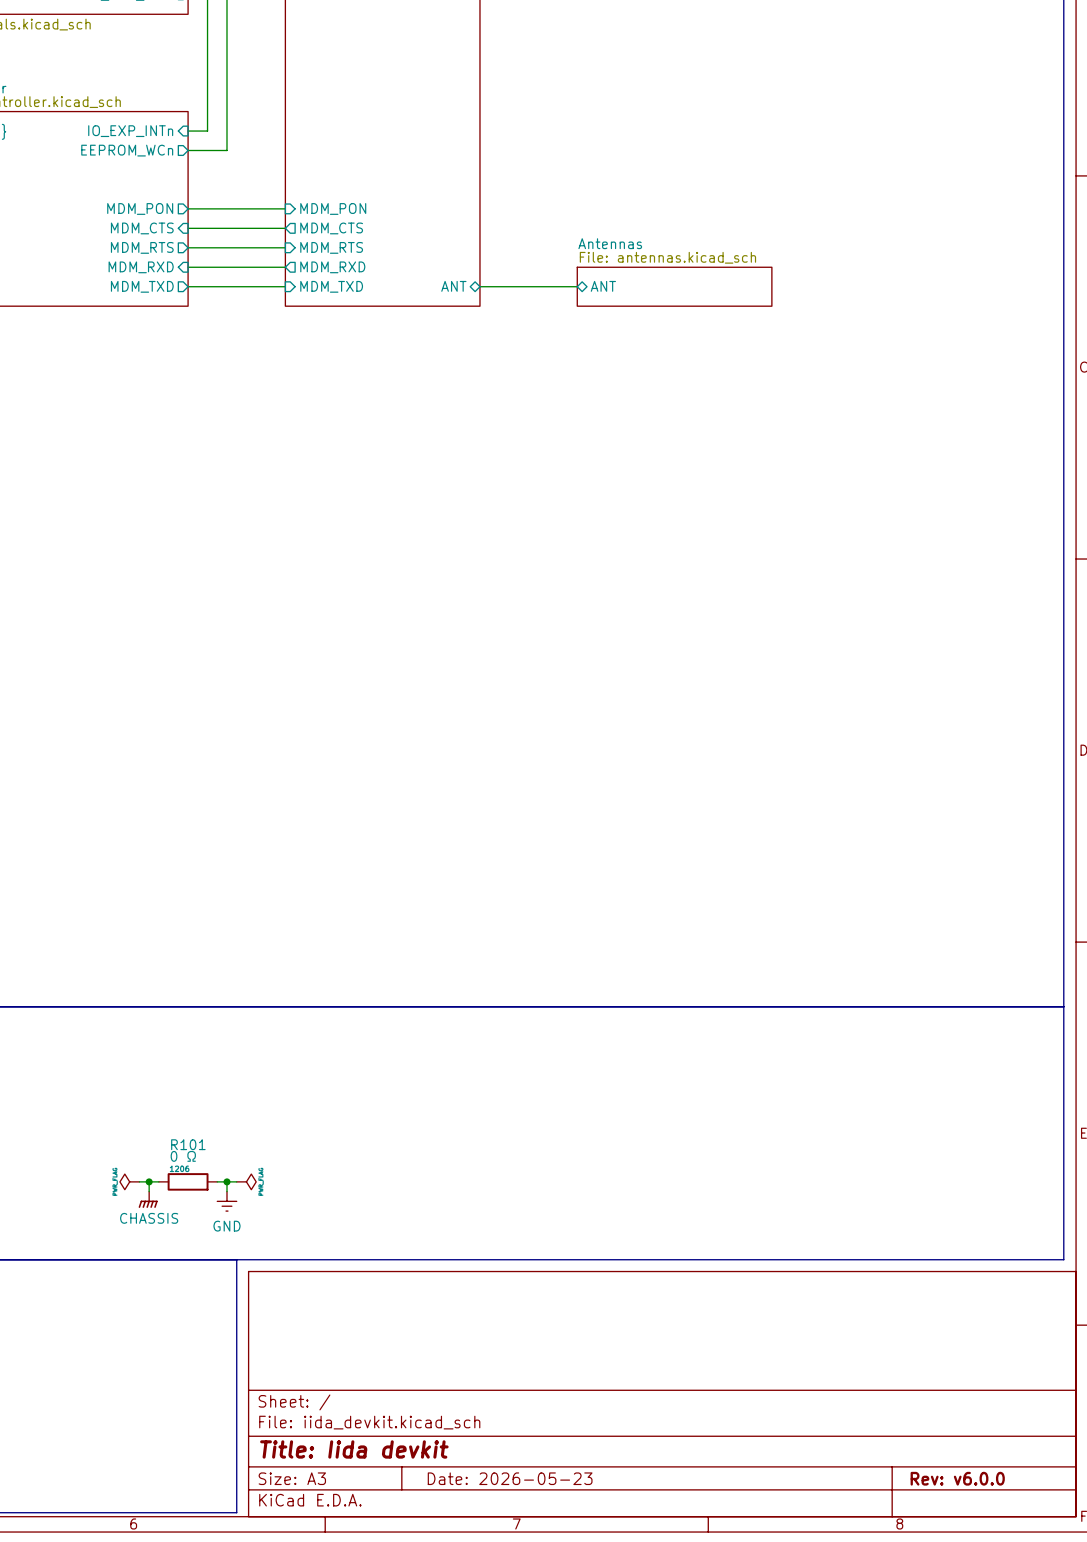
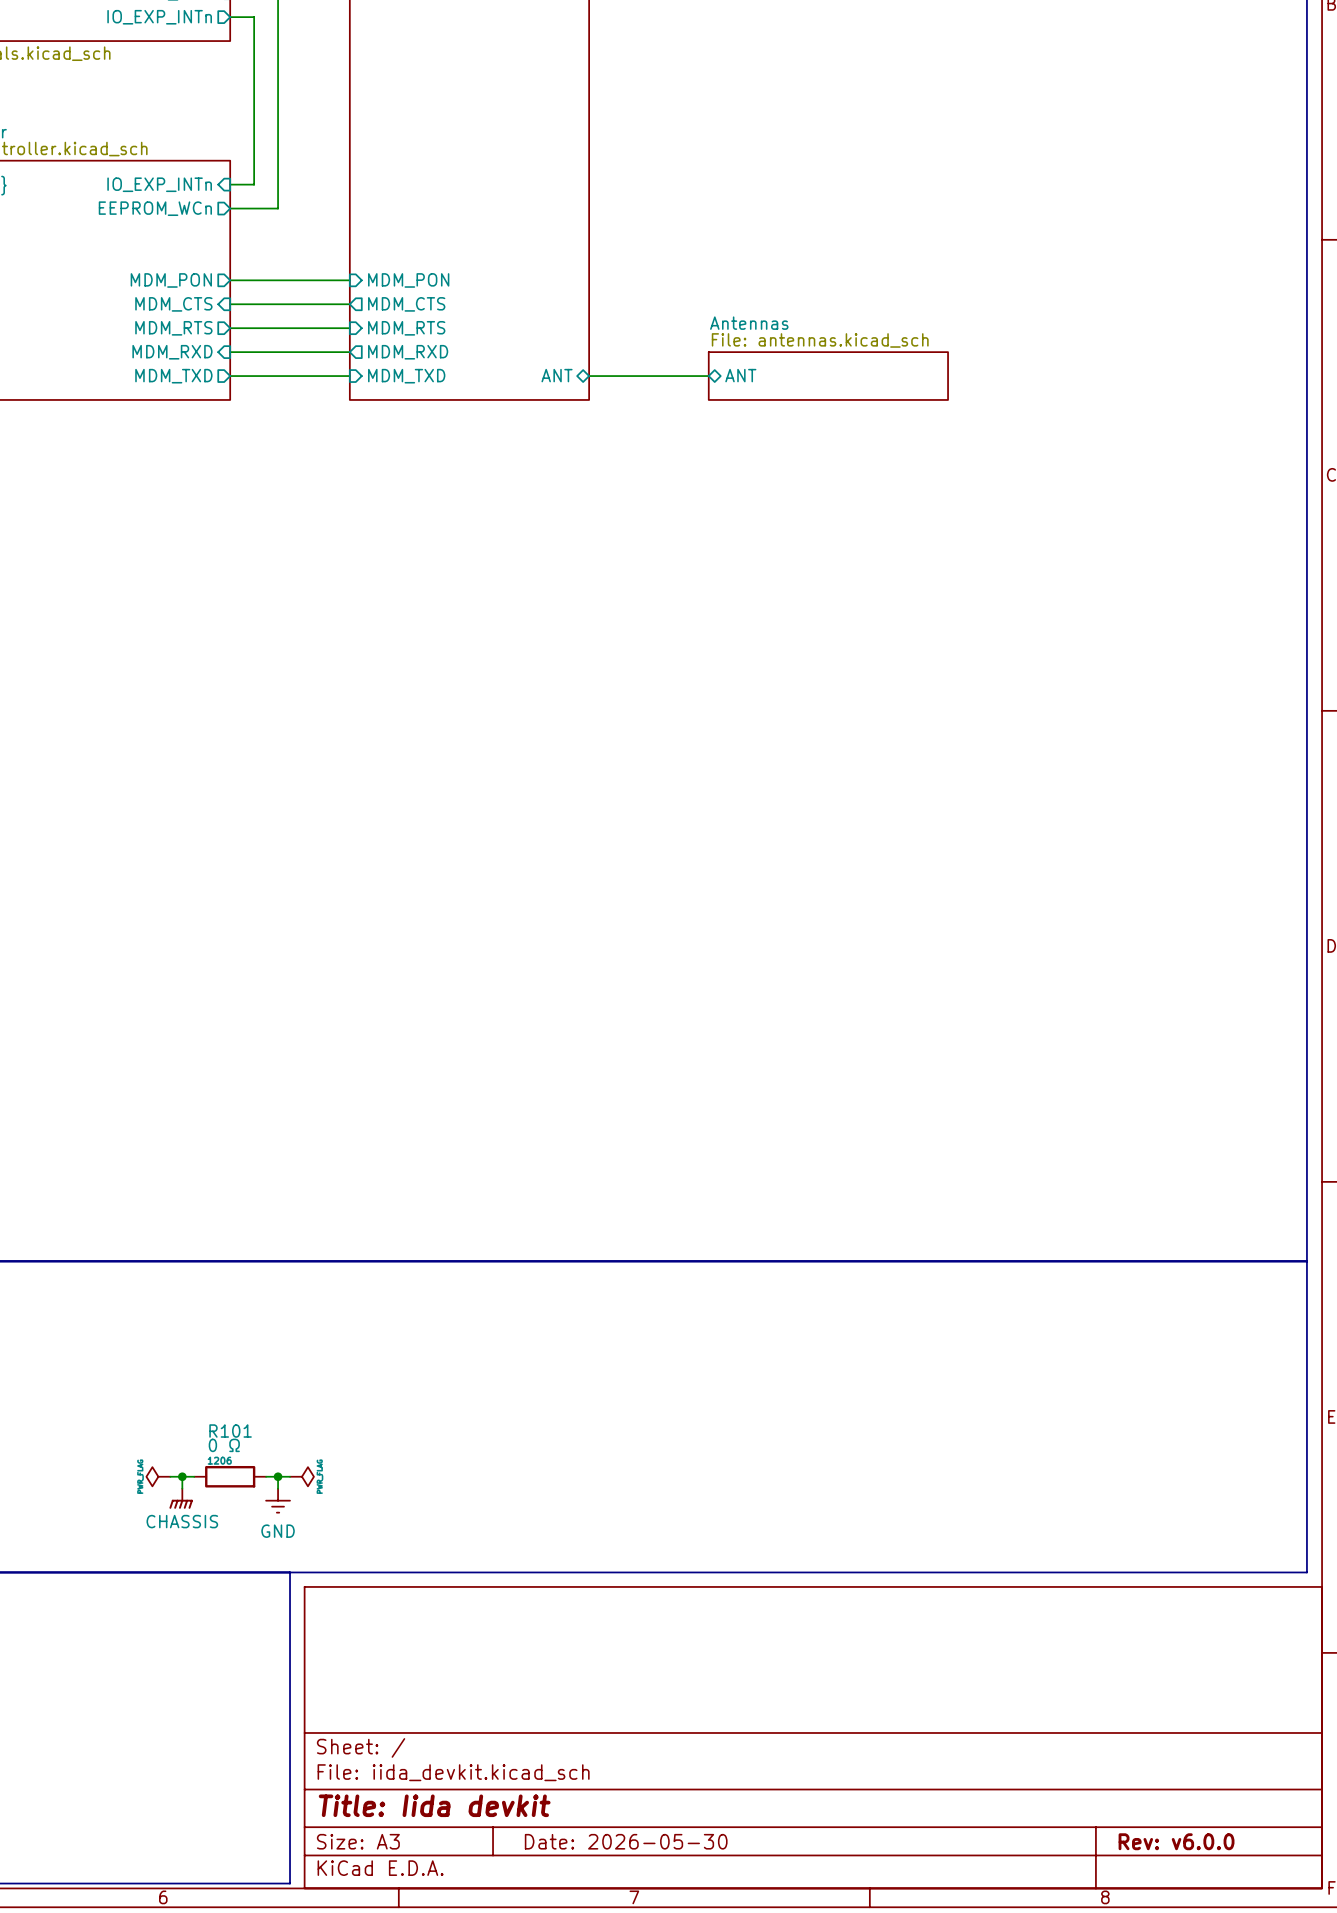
title block: Date: 2026-05-23 (510, 1478) -> Date: 2026-05-30 (626, 1841)

